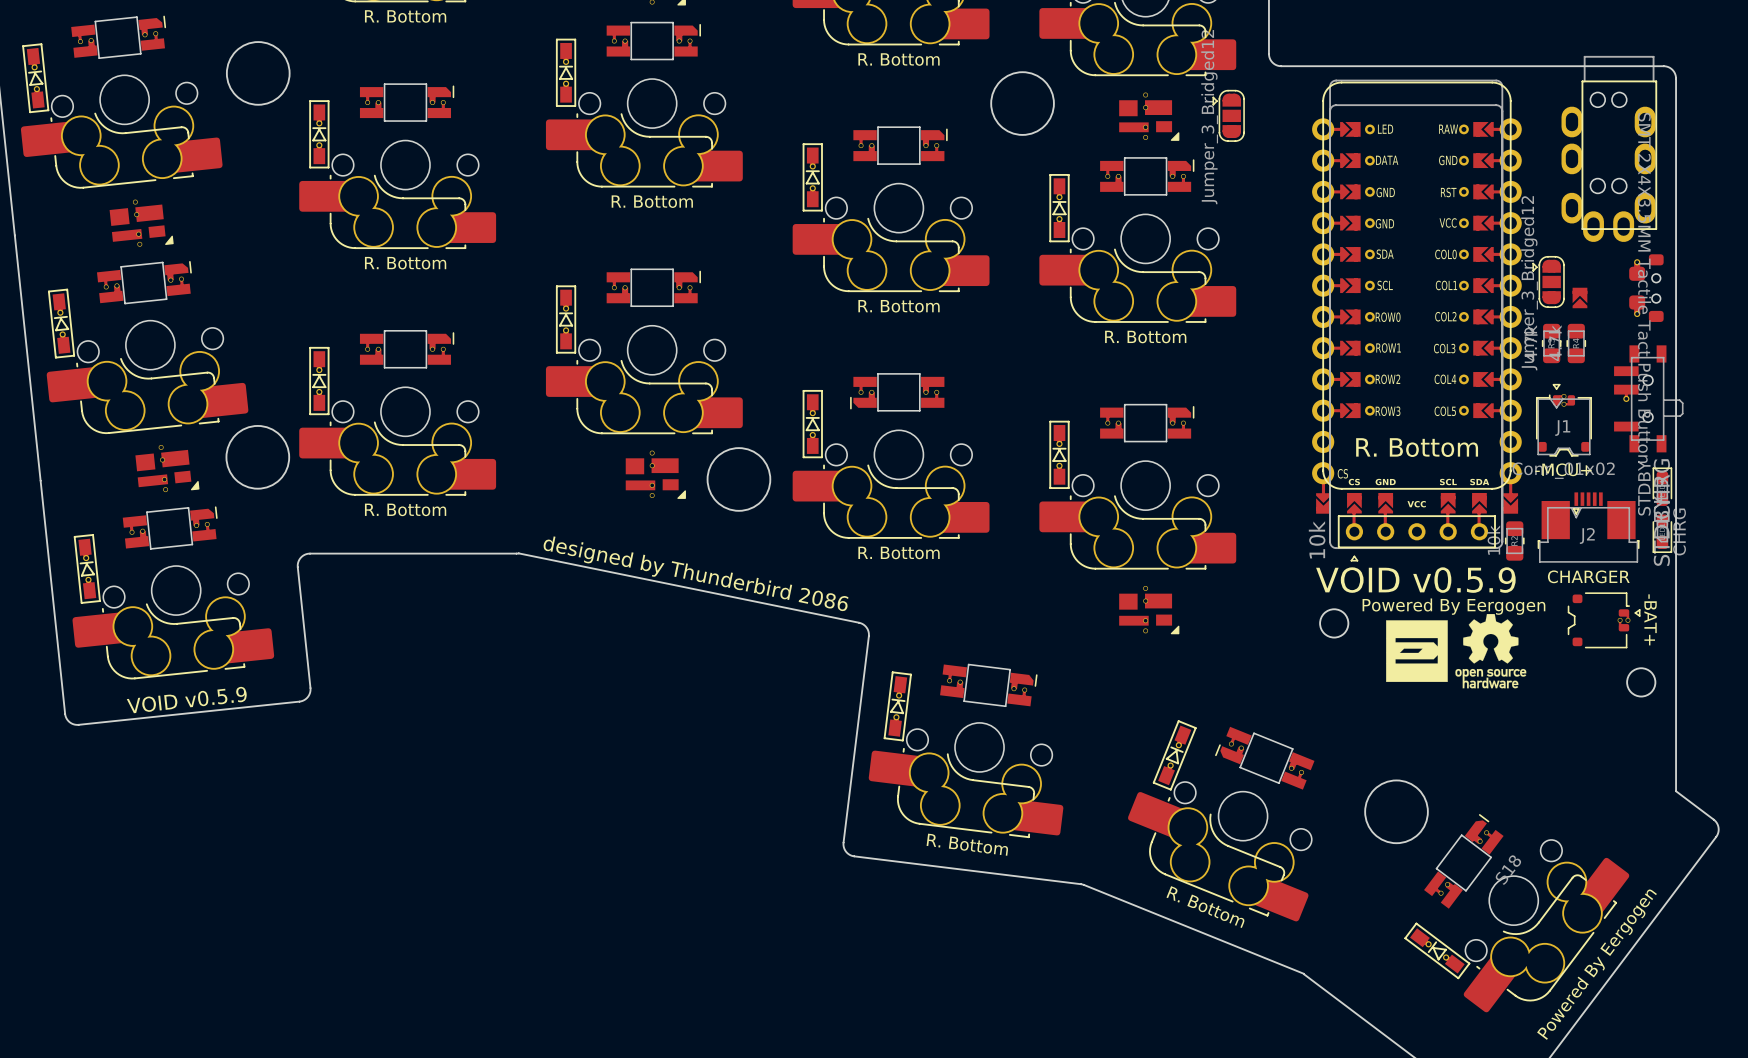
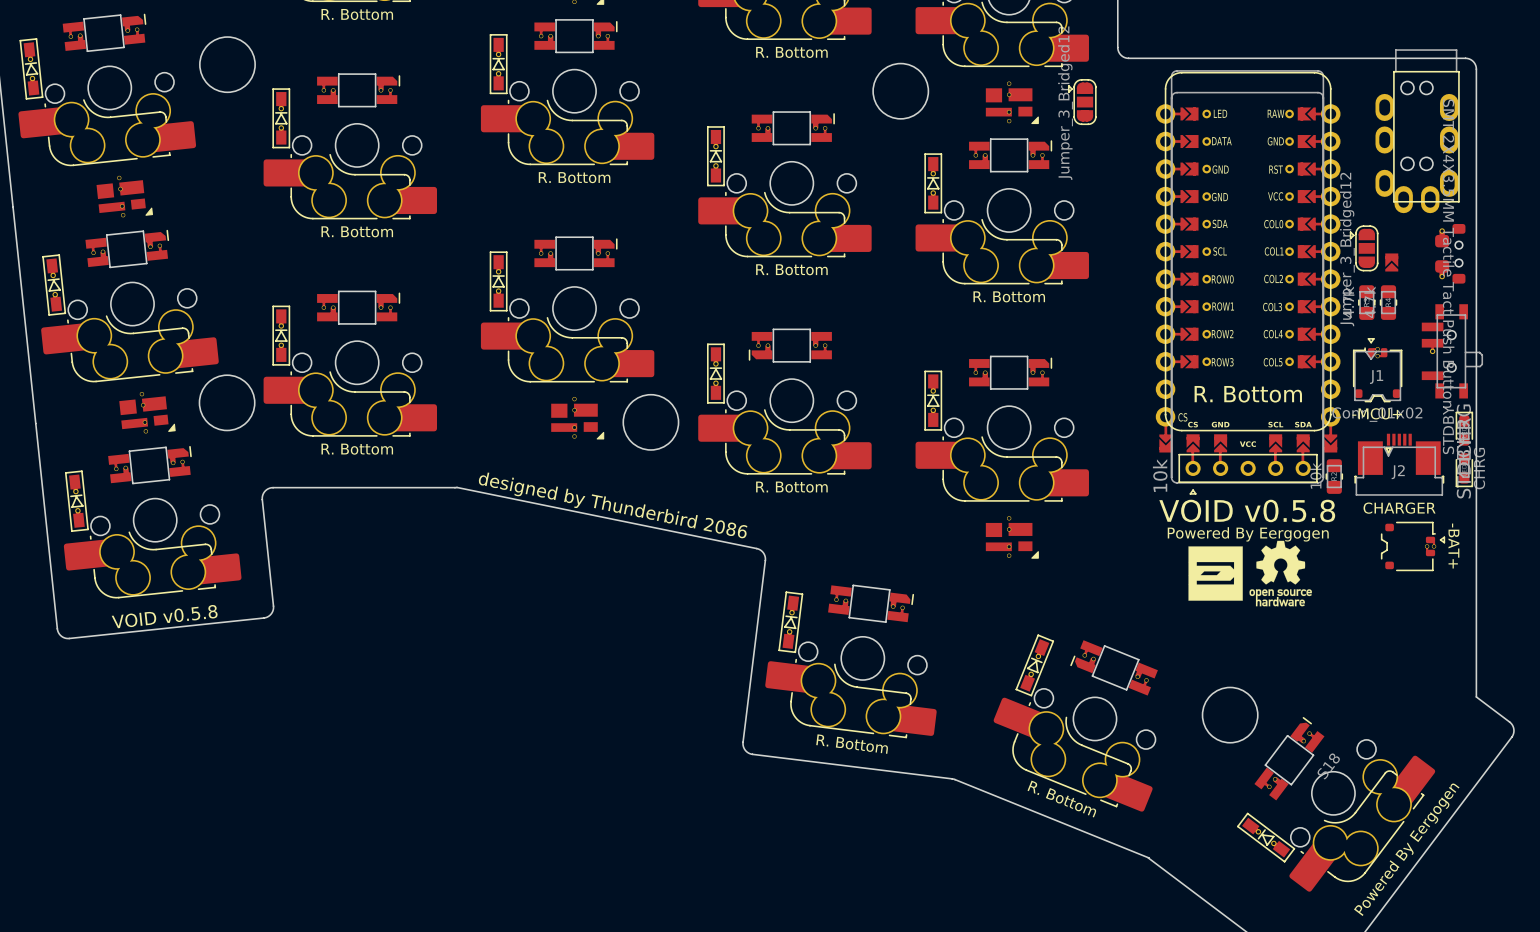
text: VOID v0.5.9 (1415, 580) -> VOID v0.5.8 (1247, 510)
text position: Powered By Eergogen (1453, 606) -> Powered By Eergogen (1248, 534)
round board edge: [1319, 608, 1350, 639] -> none
drawing position: (1416, 651) -> (1215, 573)
drawing position: (1490, 651) -> (1280, 573)
round board edge: [1626, 667, 1657, 698] -> none
text: VOID v0.5.9 (186, 699) -> VOID v0.5.8 (164, 616)

